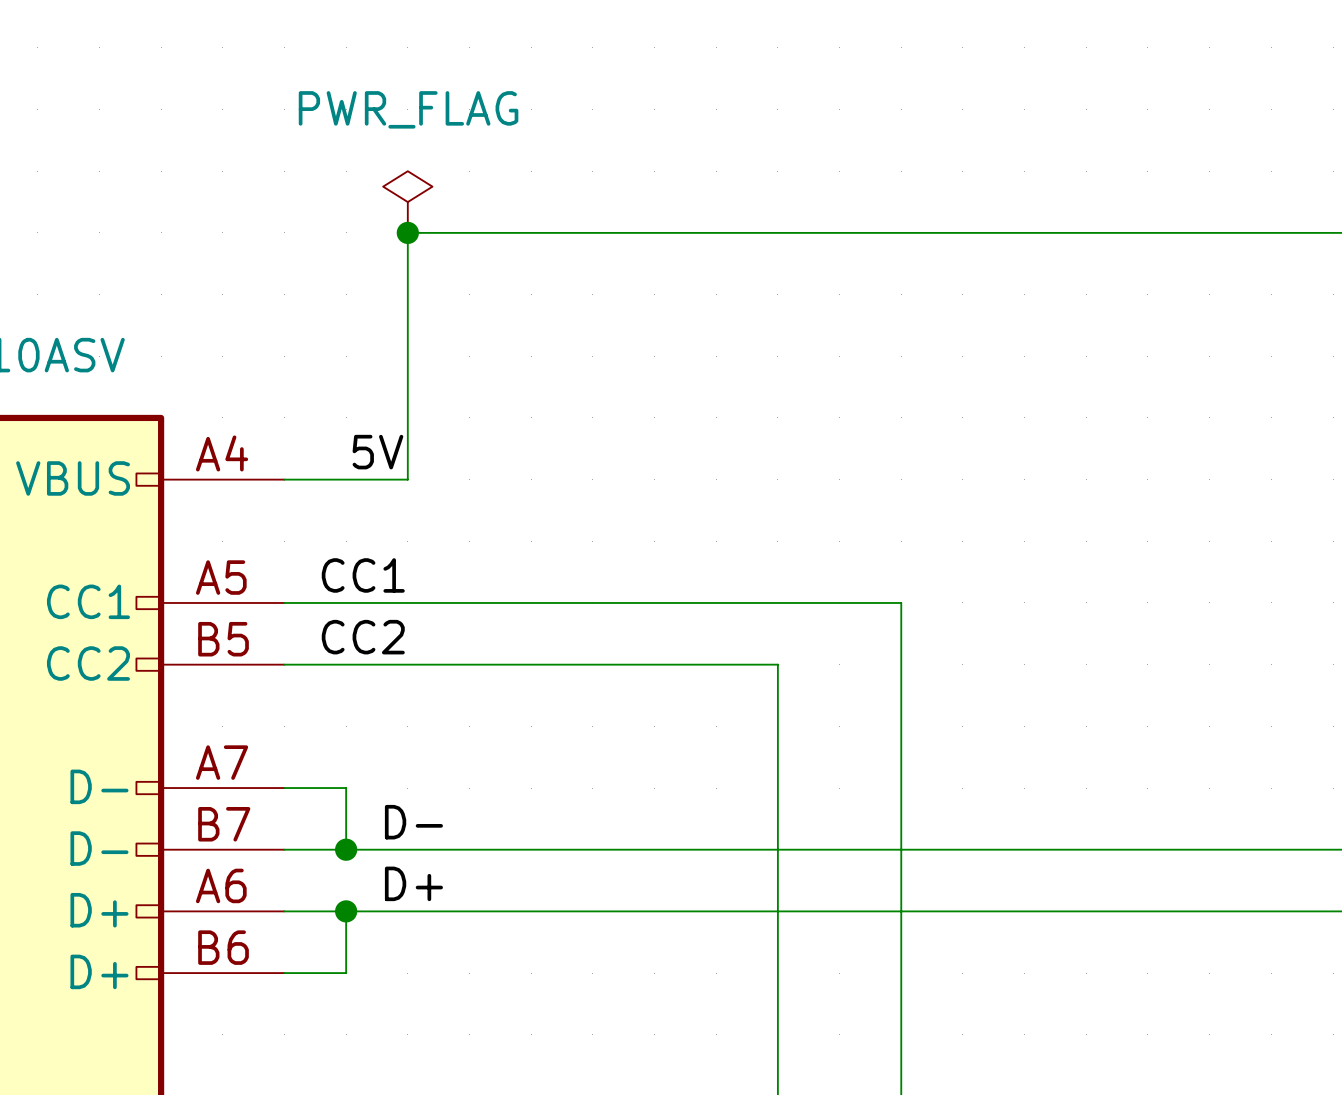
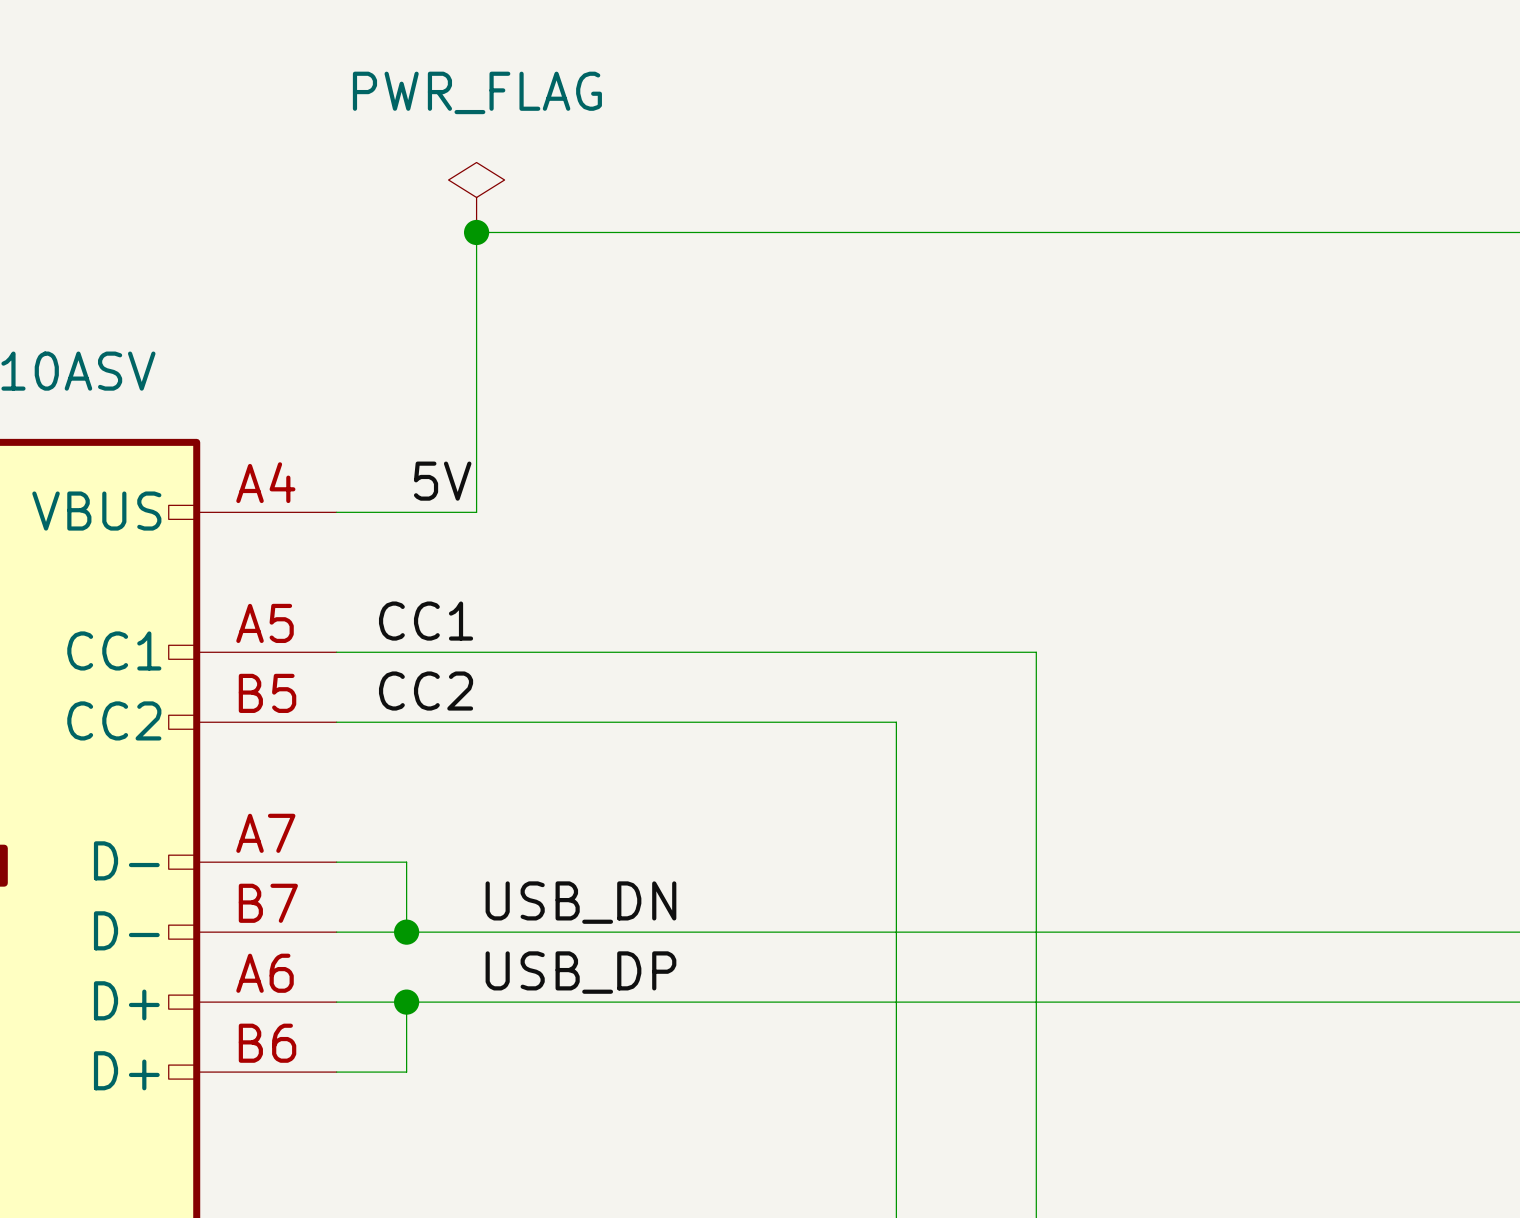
label: D- (413, 822) -> none
label: none -> USB_DN (580, 902)
label: D+ (413, 883) -> none
label: none -> USB_DP (580, 972)

